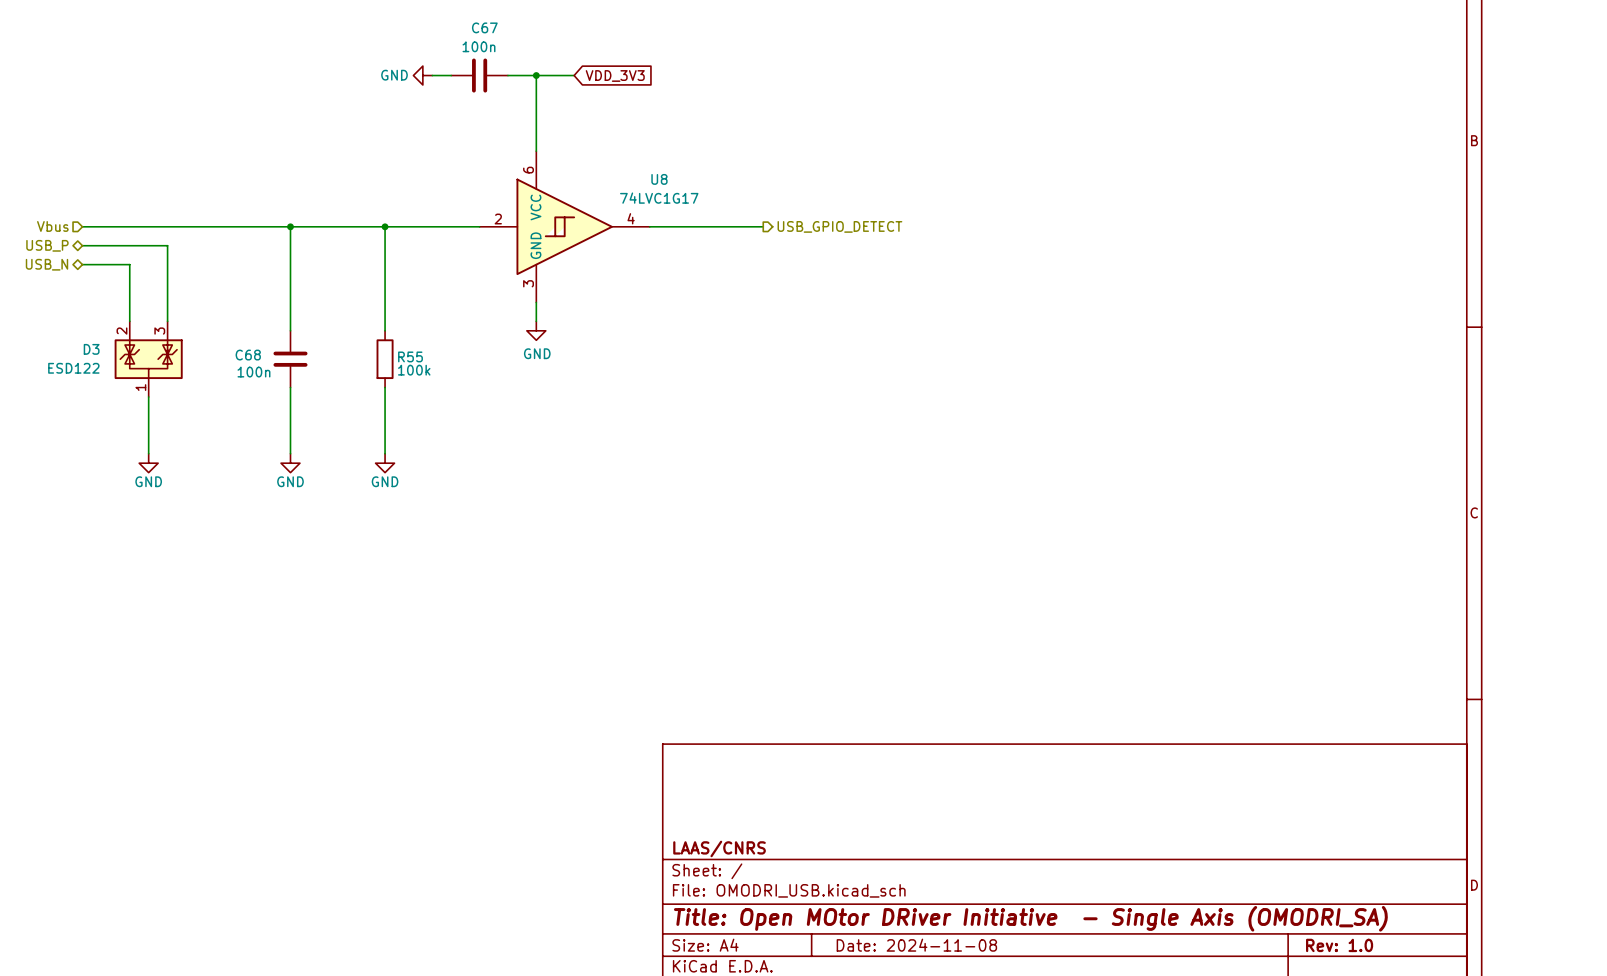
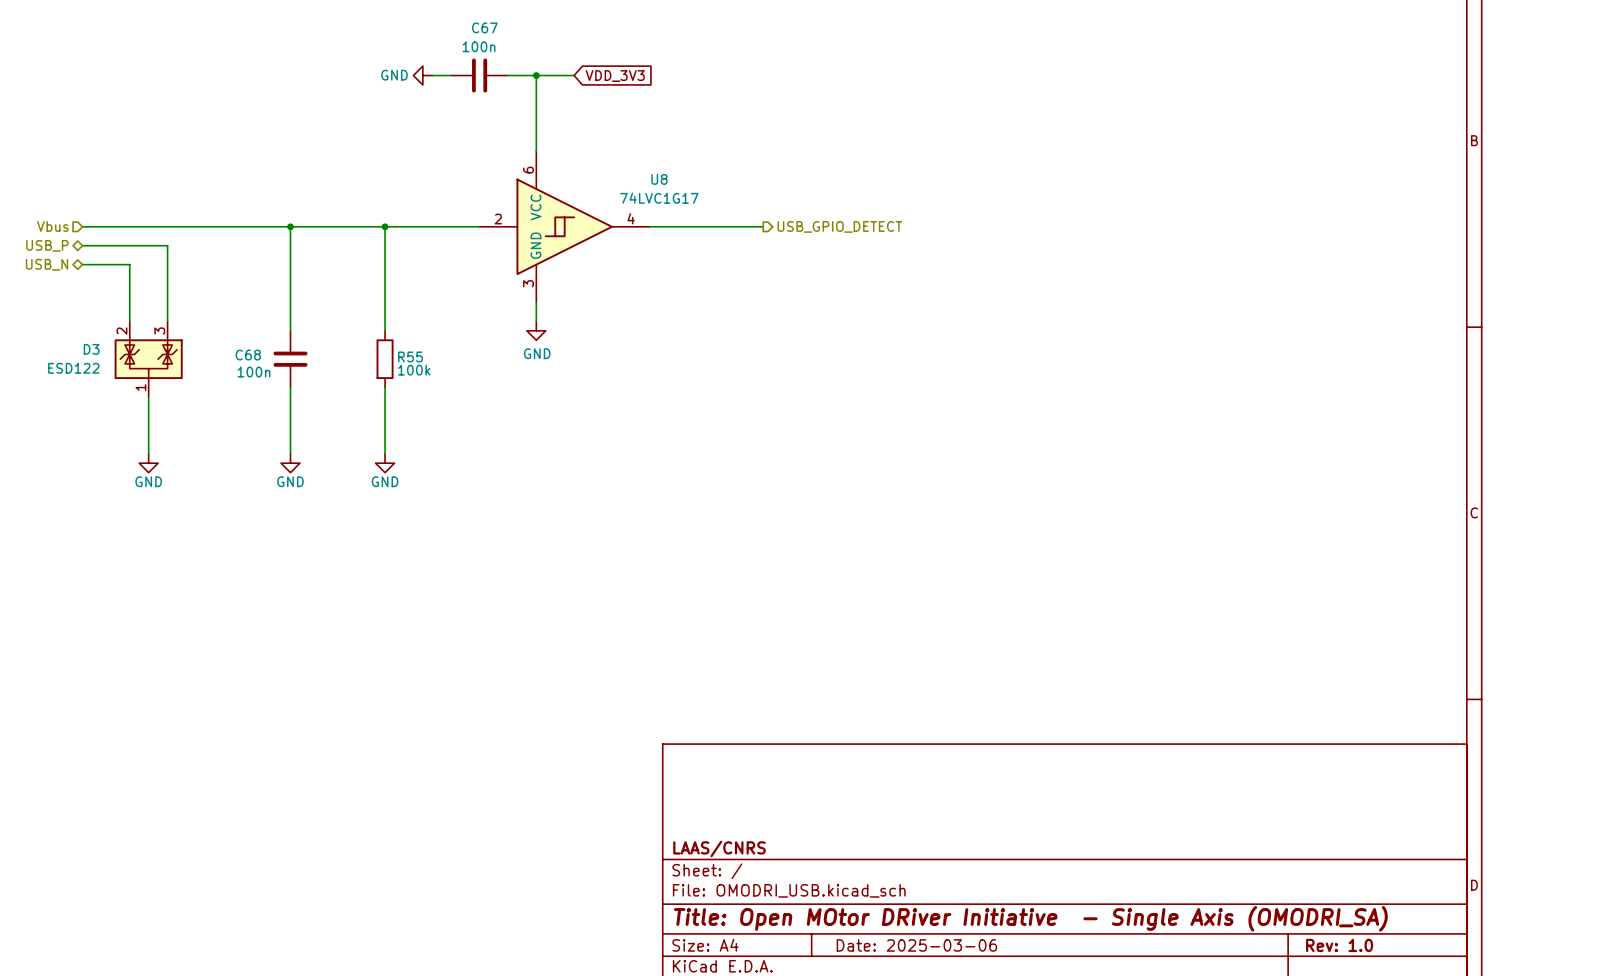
title block: Date: 2024-11-08 (916, 945) -> Date: 2025-03-06 (916, 945)

